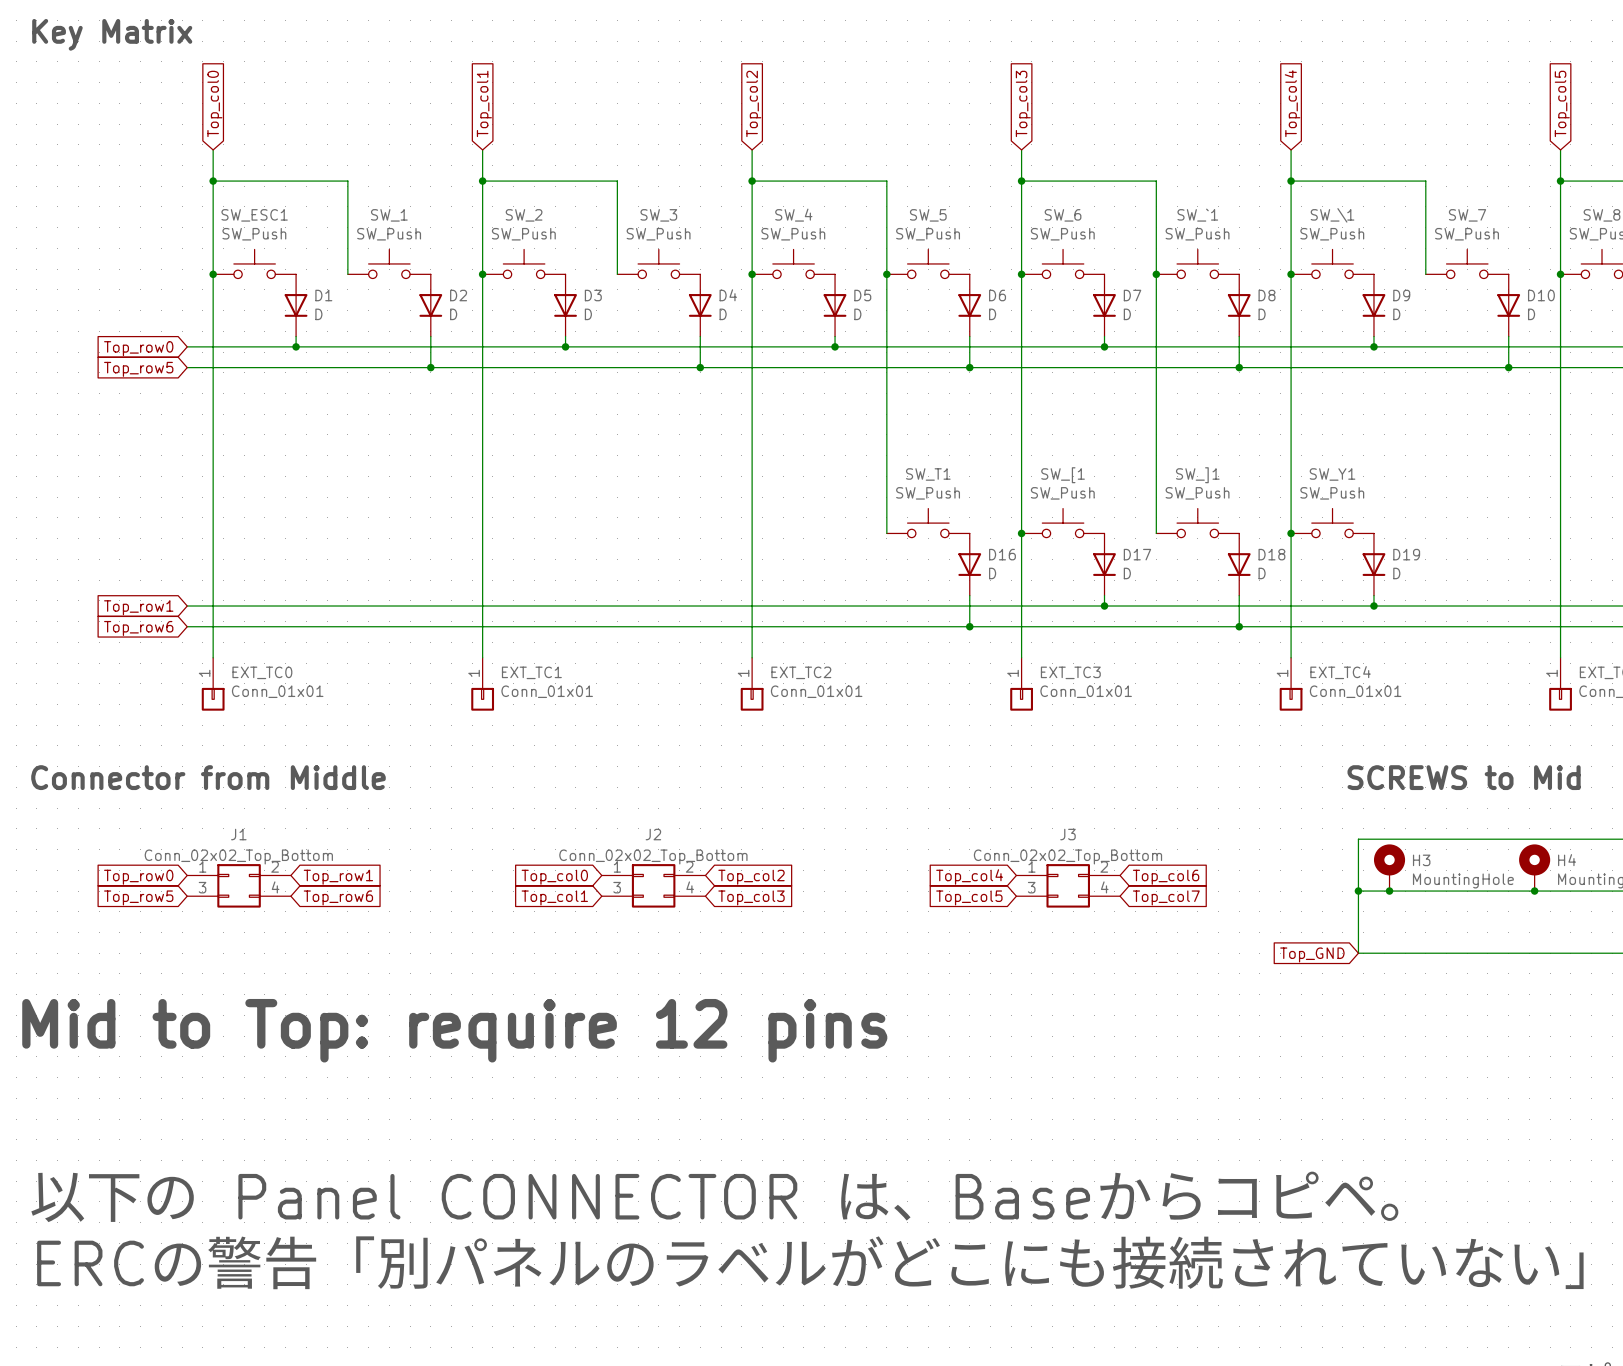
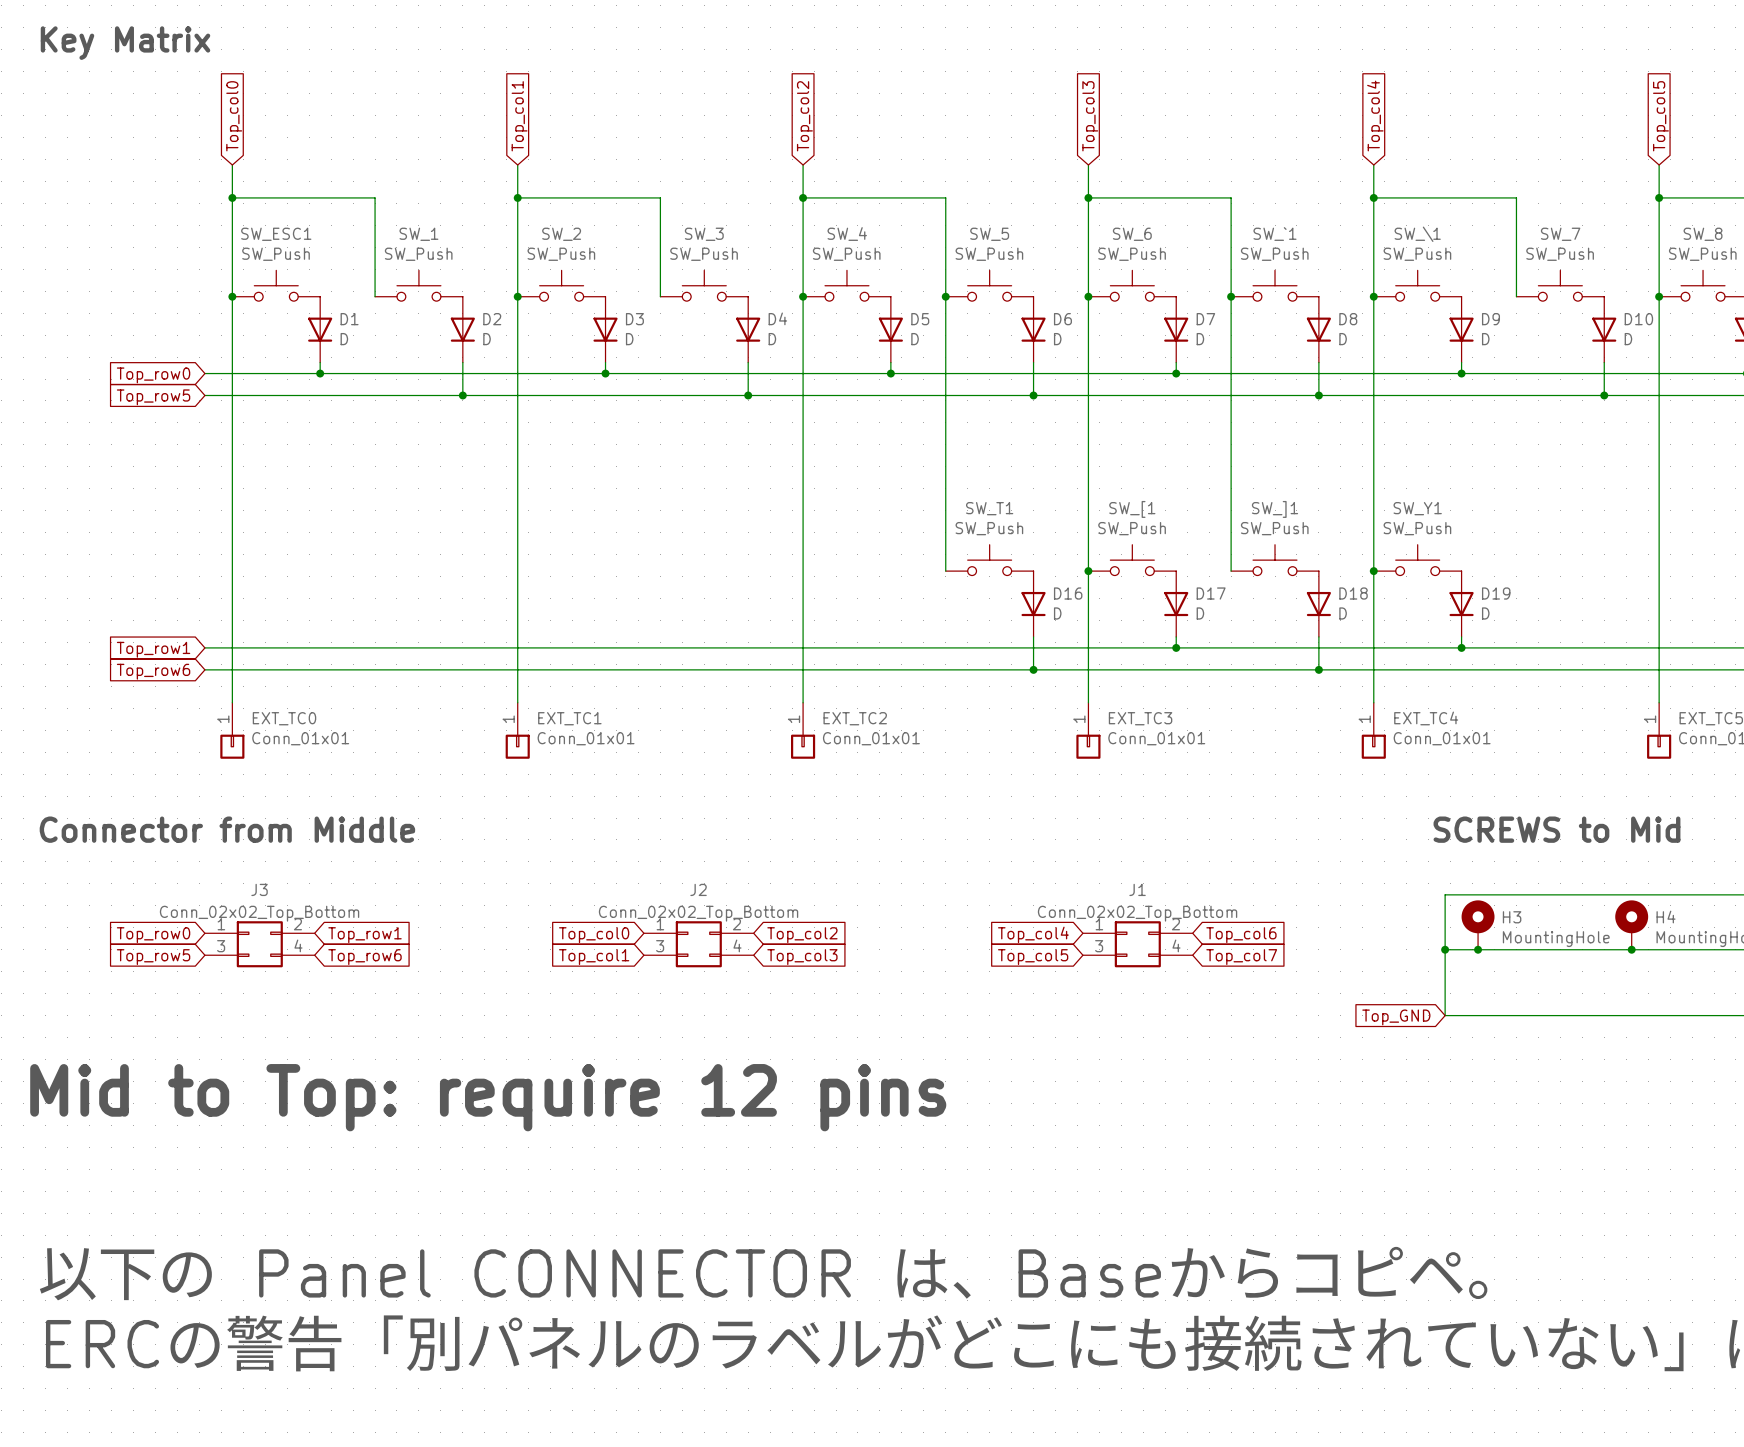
J1 name: J1 (238, 834) -> J3 (259, 889)
J3 name: J3 (1067, 834) -> J1 (1137, 889)

